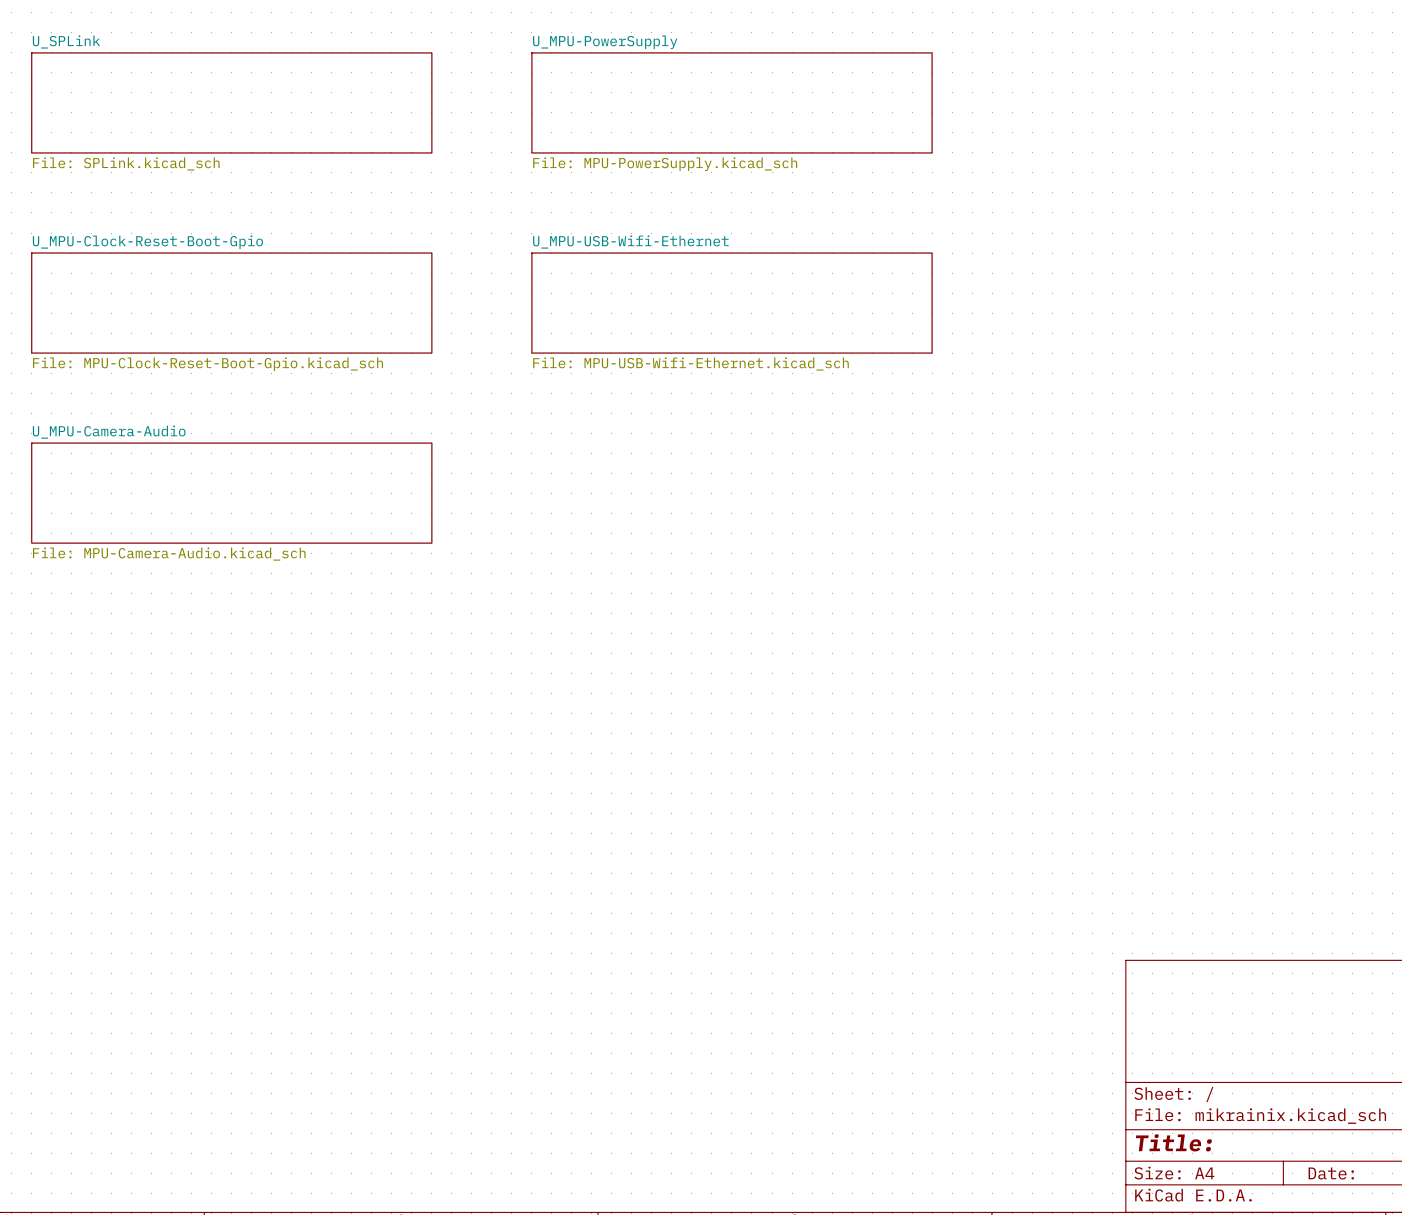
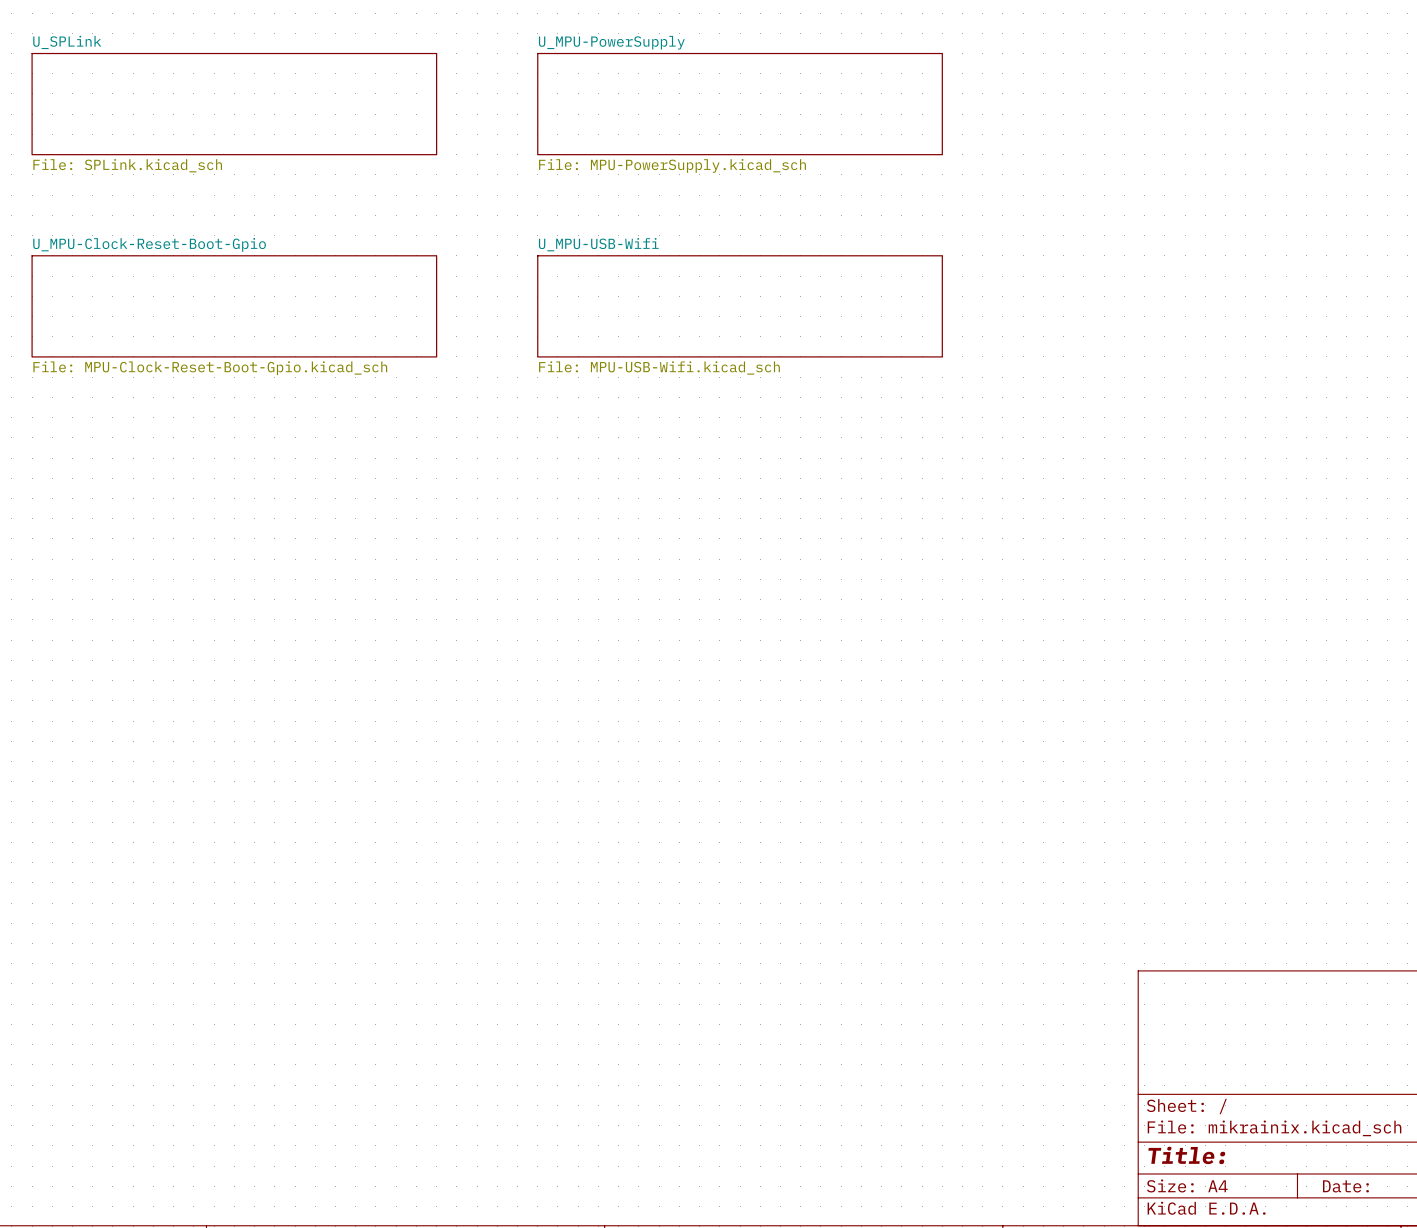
sheet U_MPU-USB-Wifi-Ethernet name: U_MPU-USB-Wifi-Ethernet (630, 242) -> U_MPU-USB-Wifi (598, 244)
sheet U_MPU-USB-Wifi-Ethernet value: File: MPU-USB-Wifi-Ethernet.kicad_sch (690, 363) -> File: MPU-USB-Wifi.kicad_sch (659, 367)
sheet U_MPU-Camera-Audio: File: MPU-Camera-Audio.kicad_sch (231, 493) -> none

